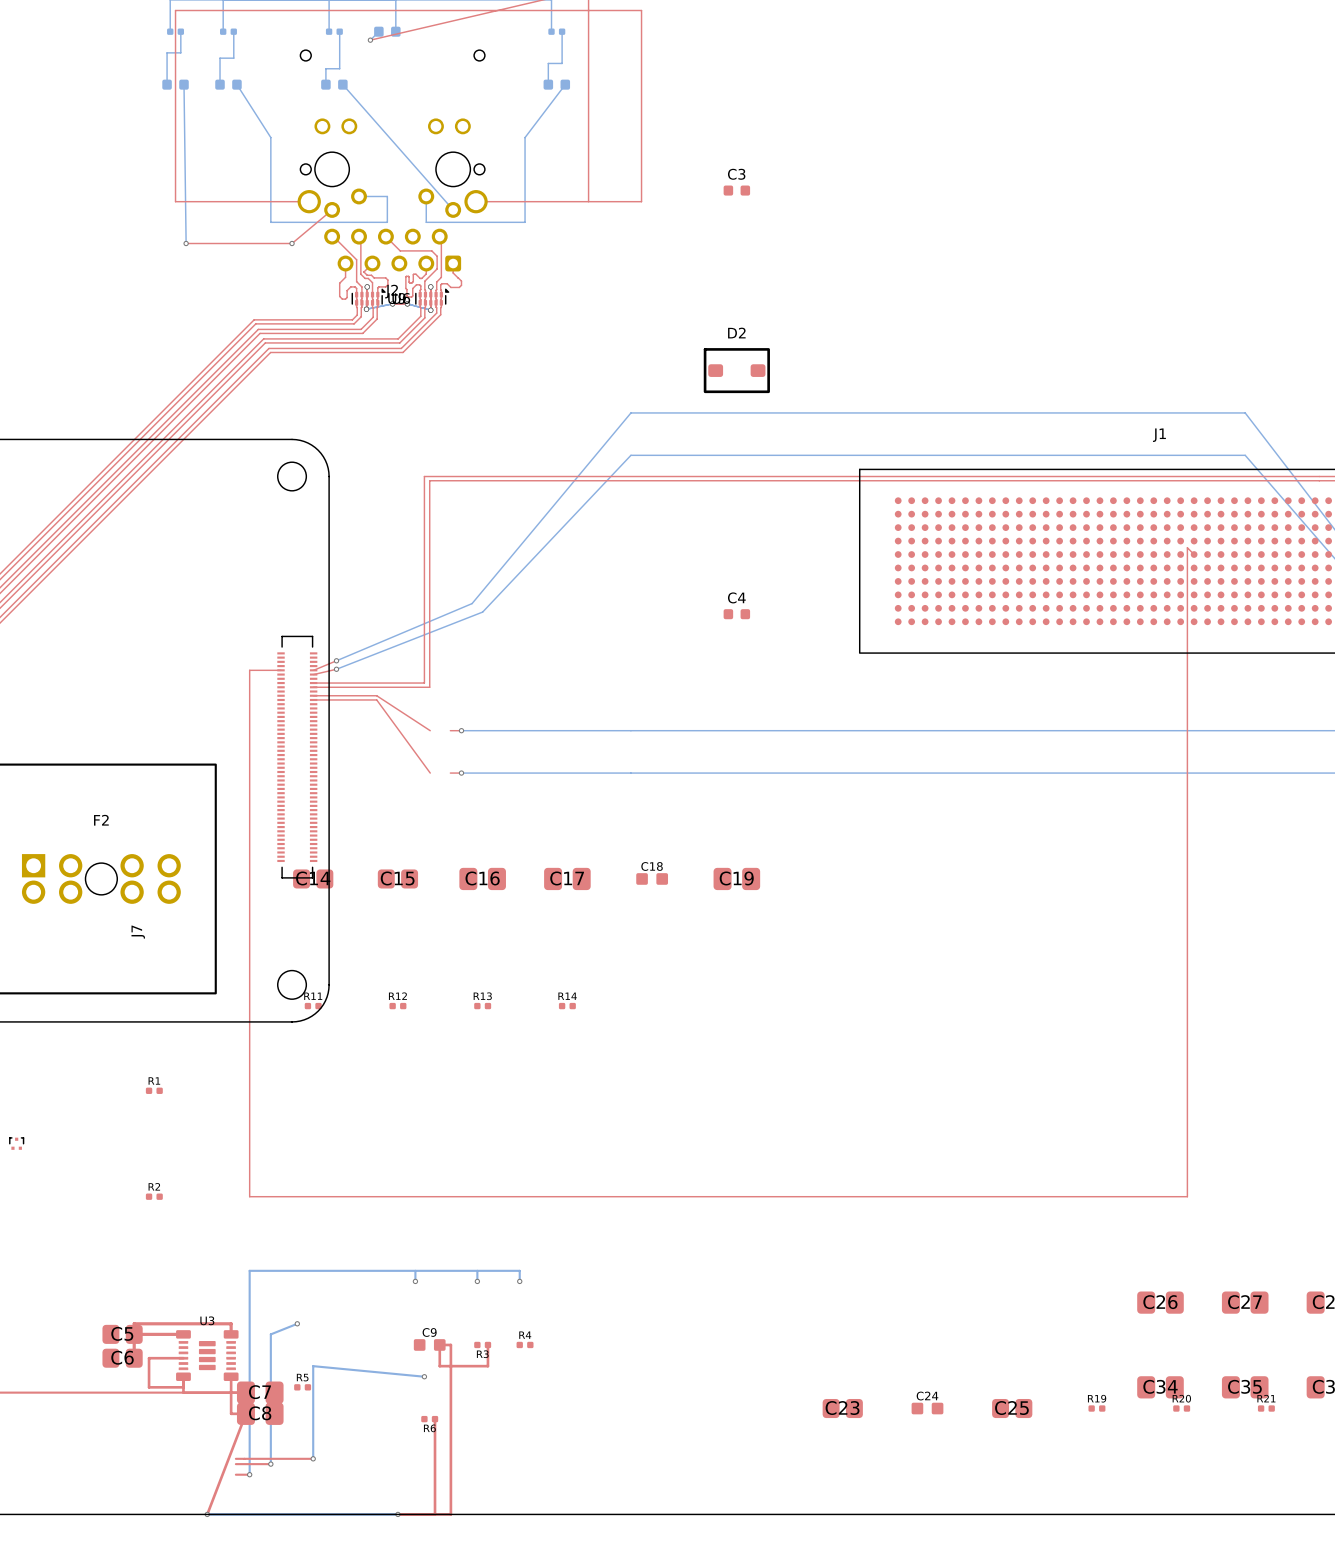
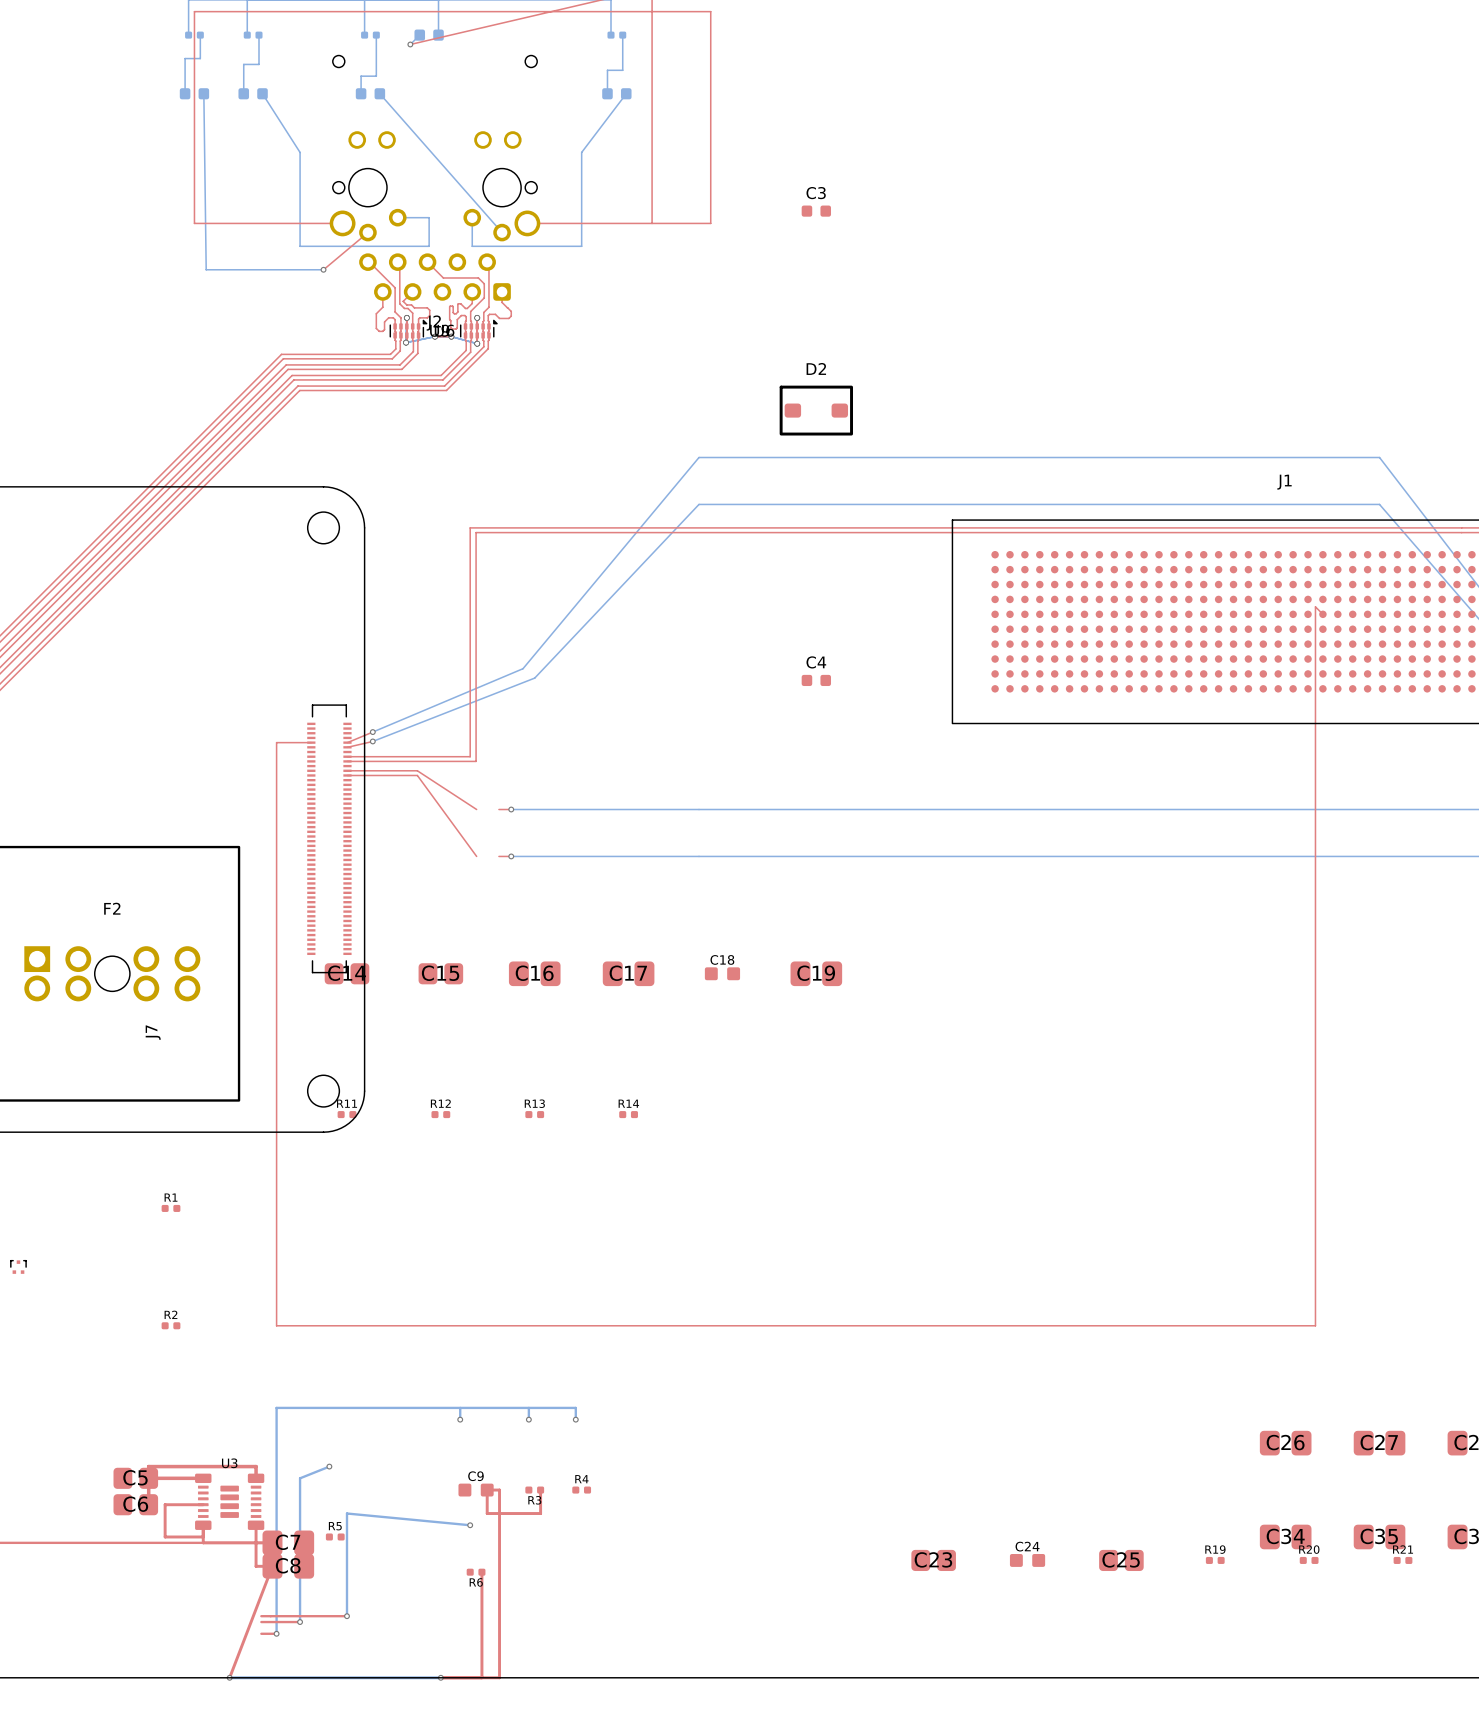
top track: (186, 243) (292, 243) -> none
bottom track: none -> (206, 269) (323, 269)
via: (186, 243) -> none

